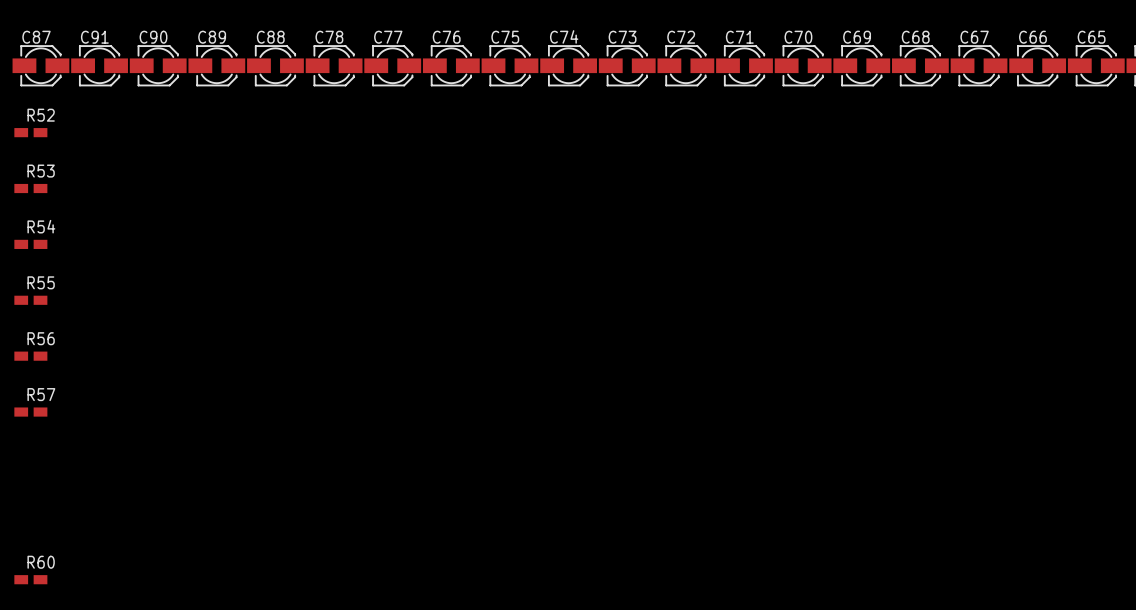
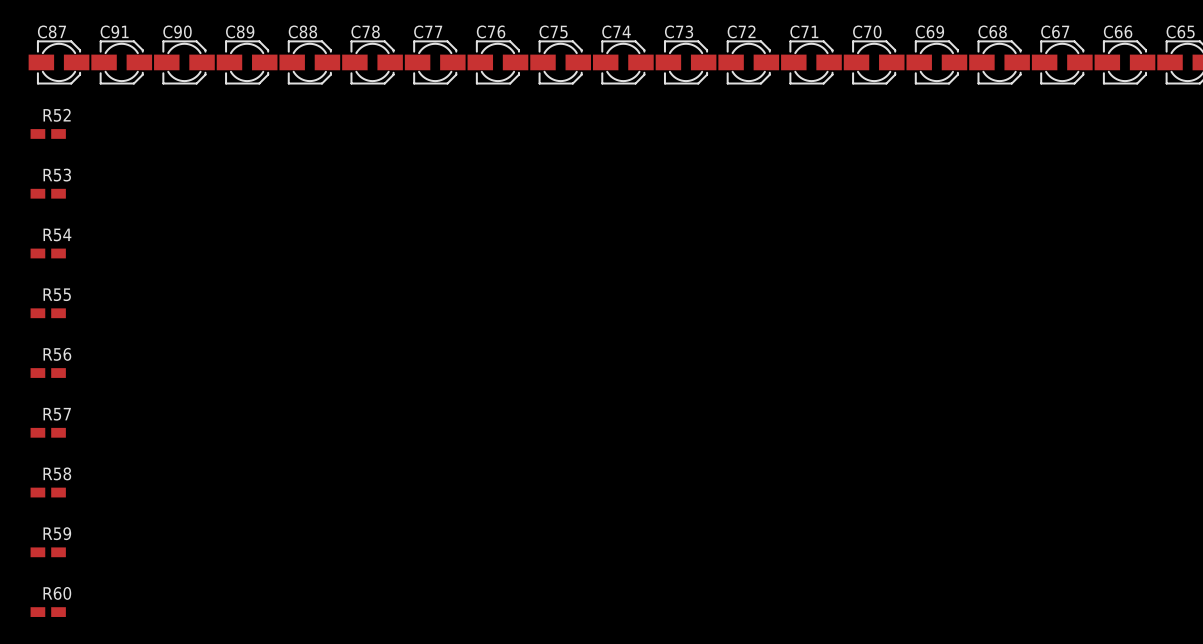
R58: none -> (48, 492)
R59: none -> (48, 552)

